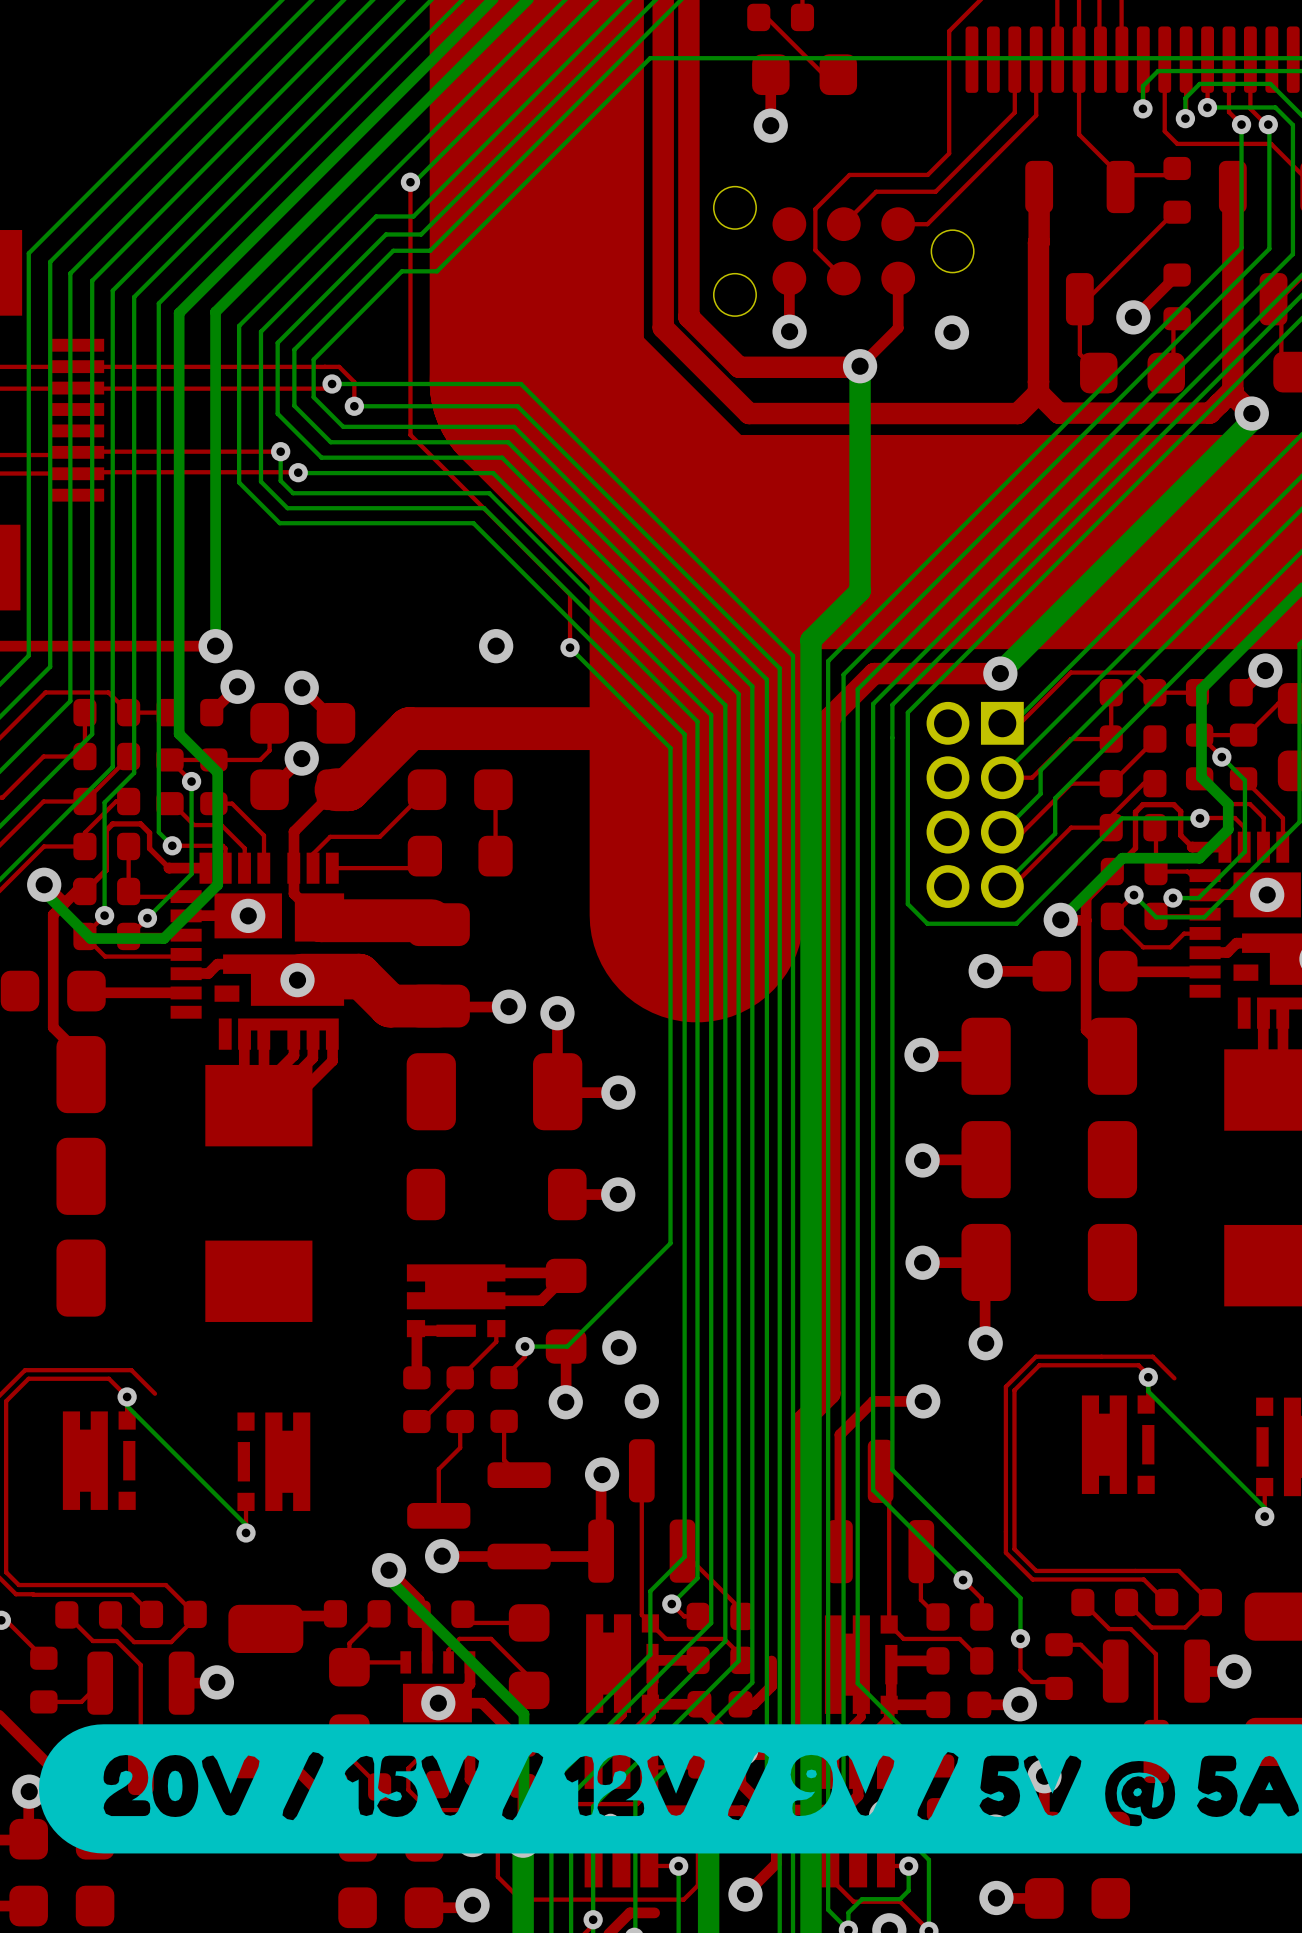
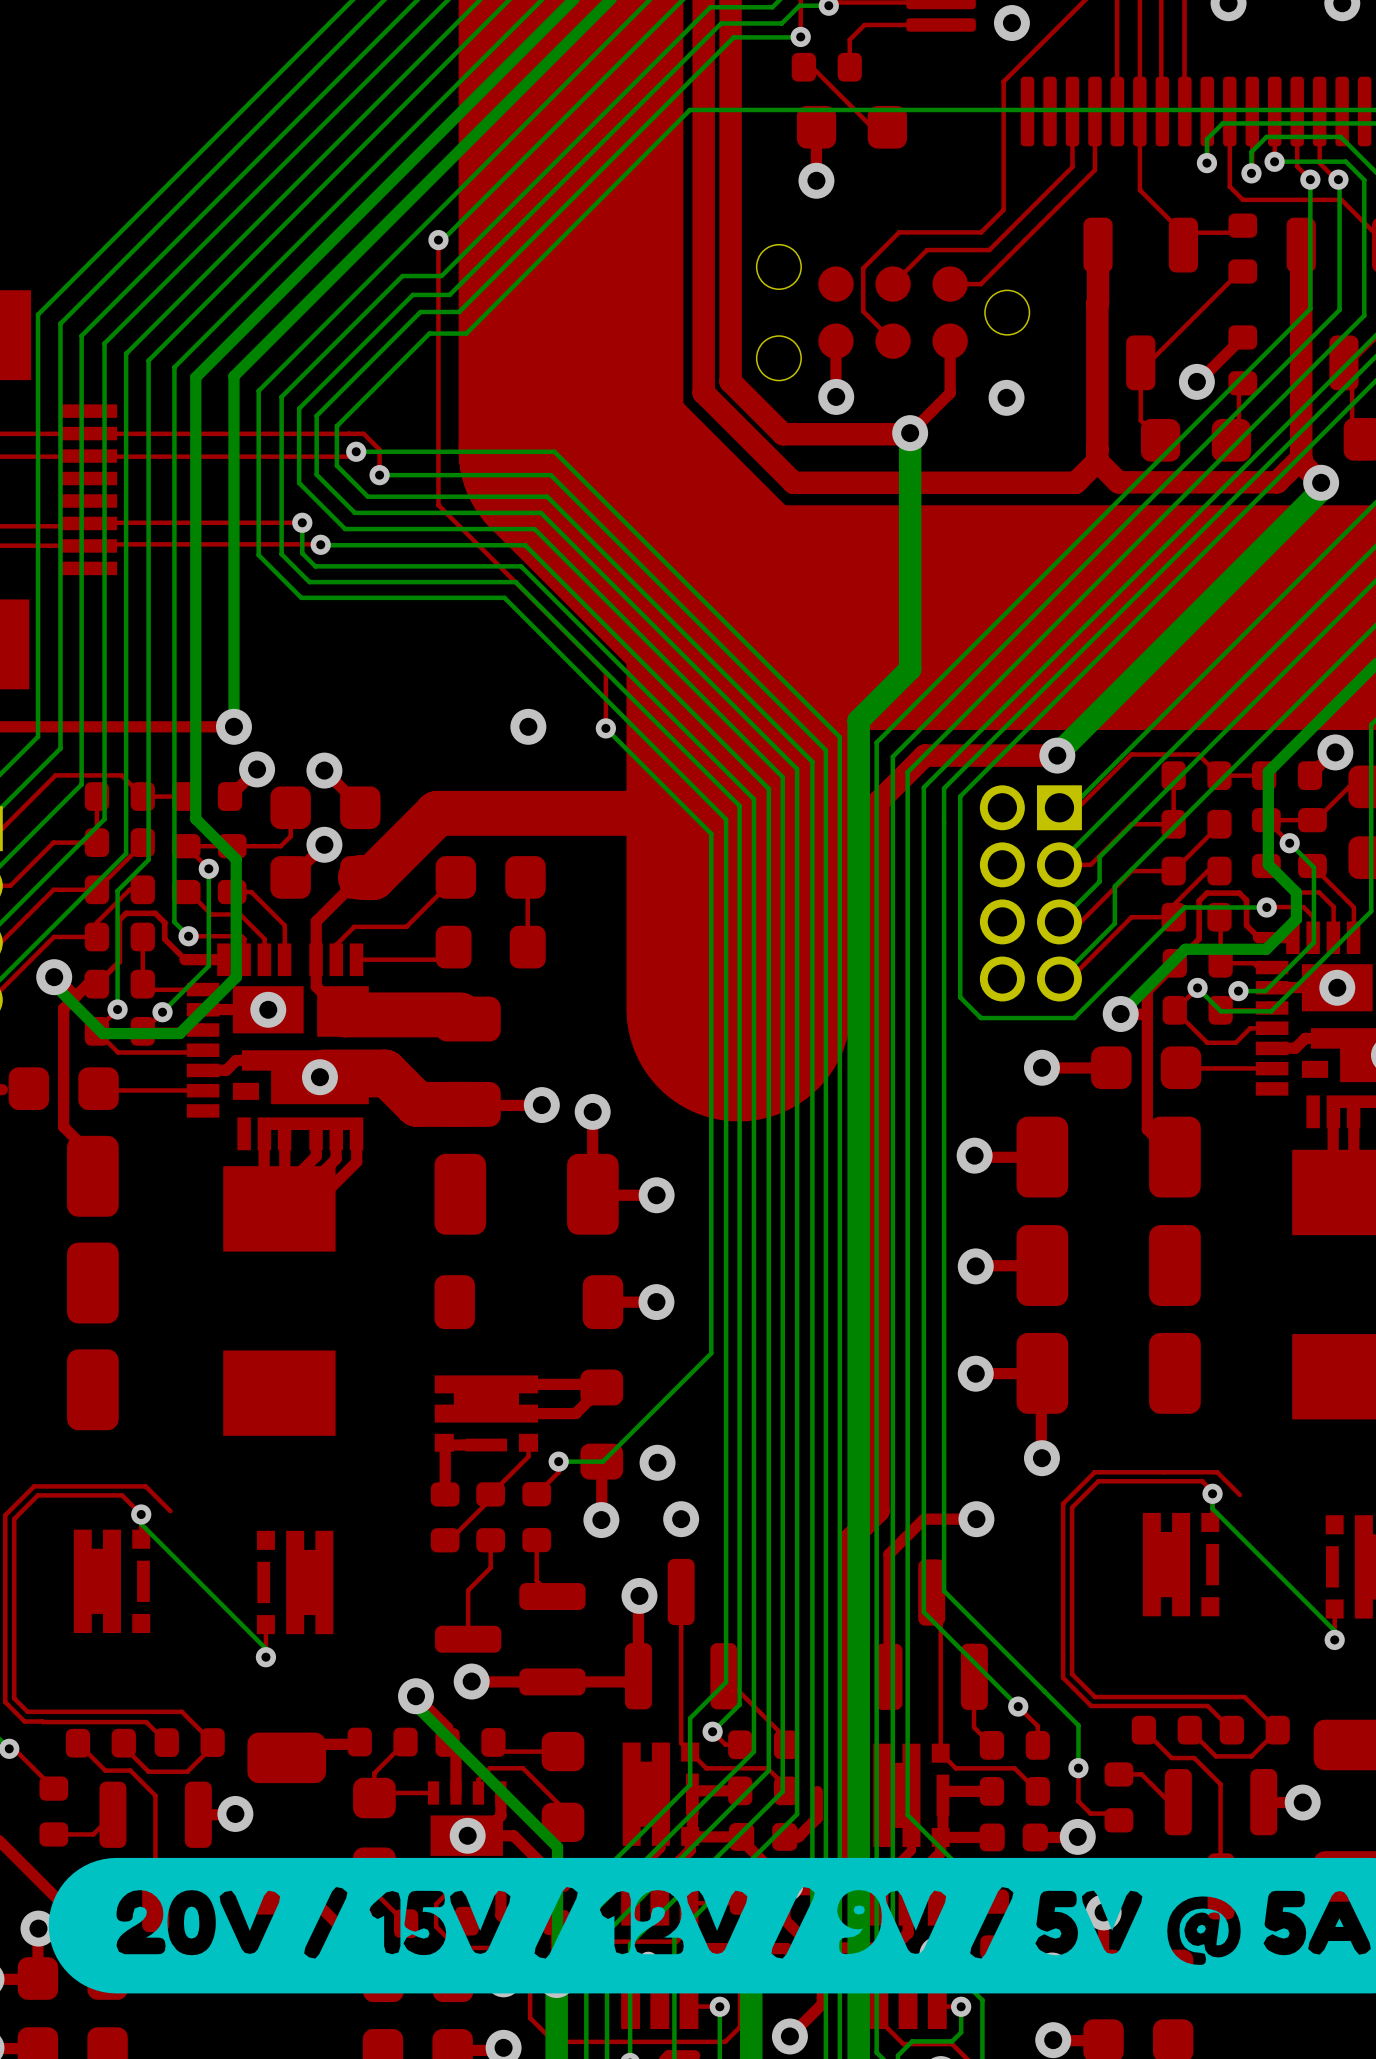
top track width: thick (1205, 971) (1118, 971) -> thin (1272, 1068) (1181, 1068)
top track width: thick (186, 992) (88, 992) -> thin (203, 1090) (100, 1090)

